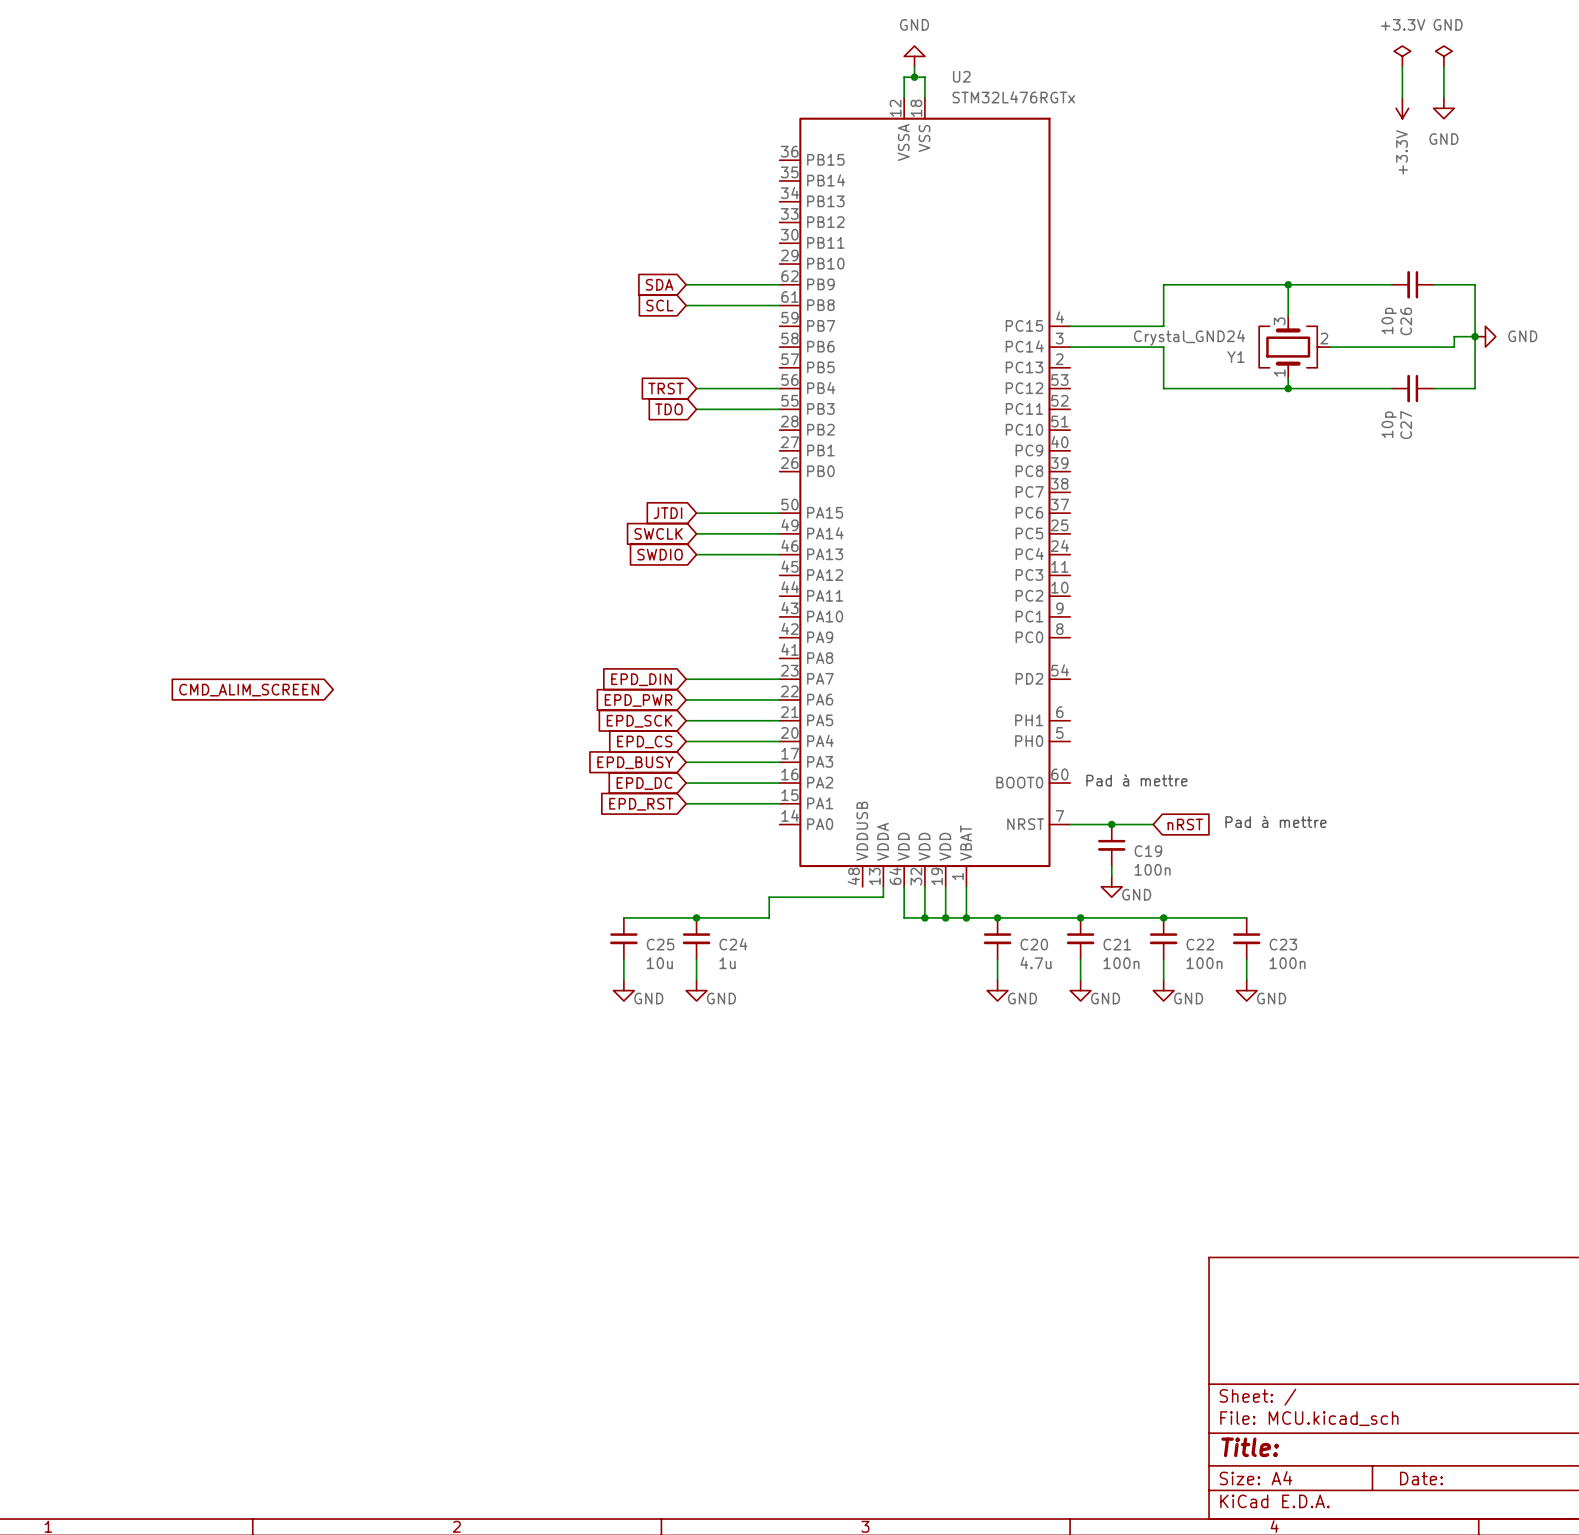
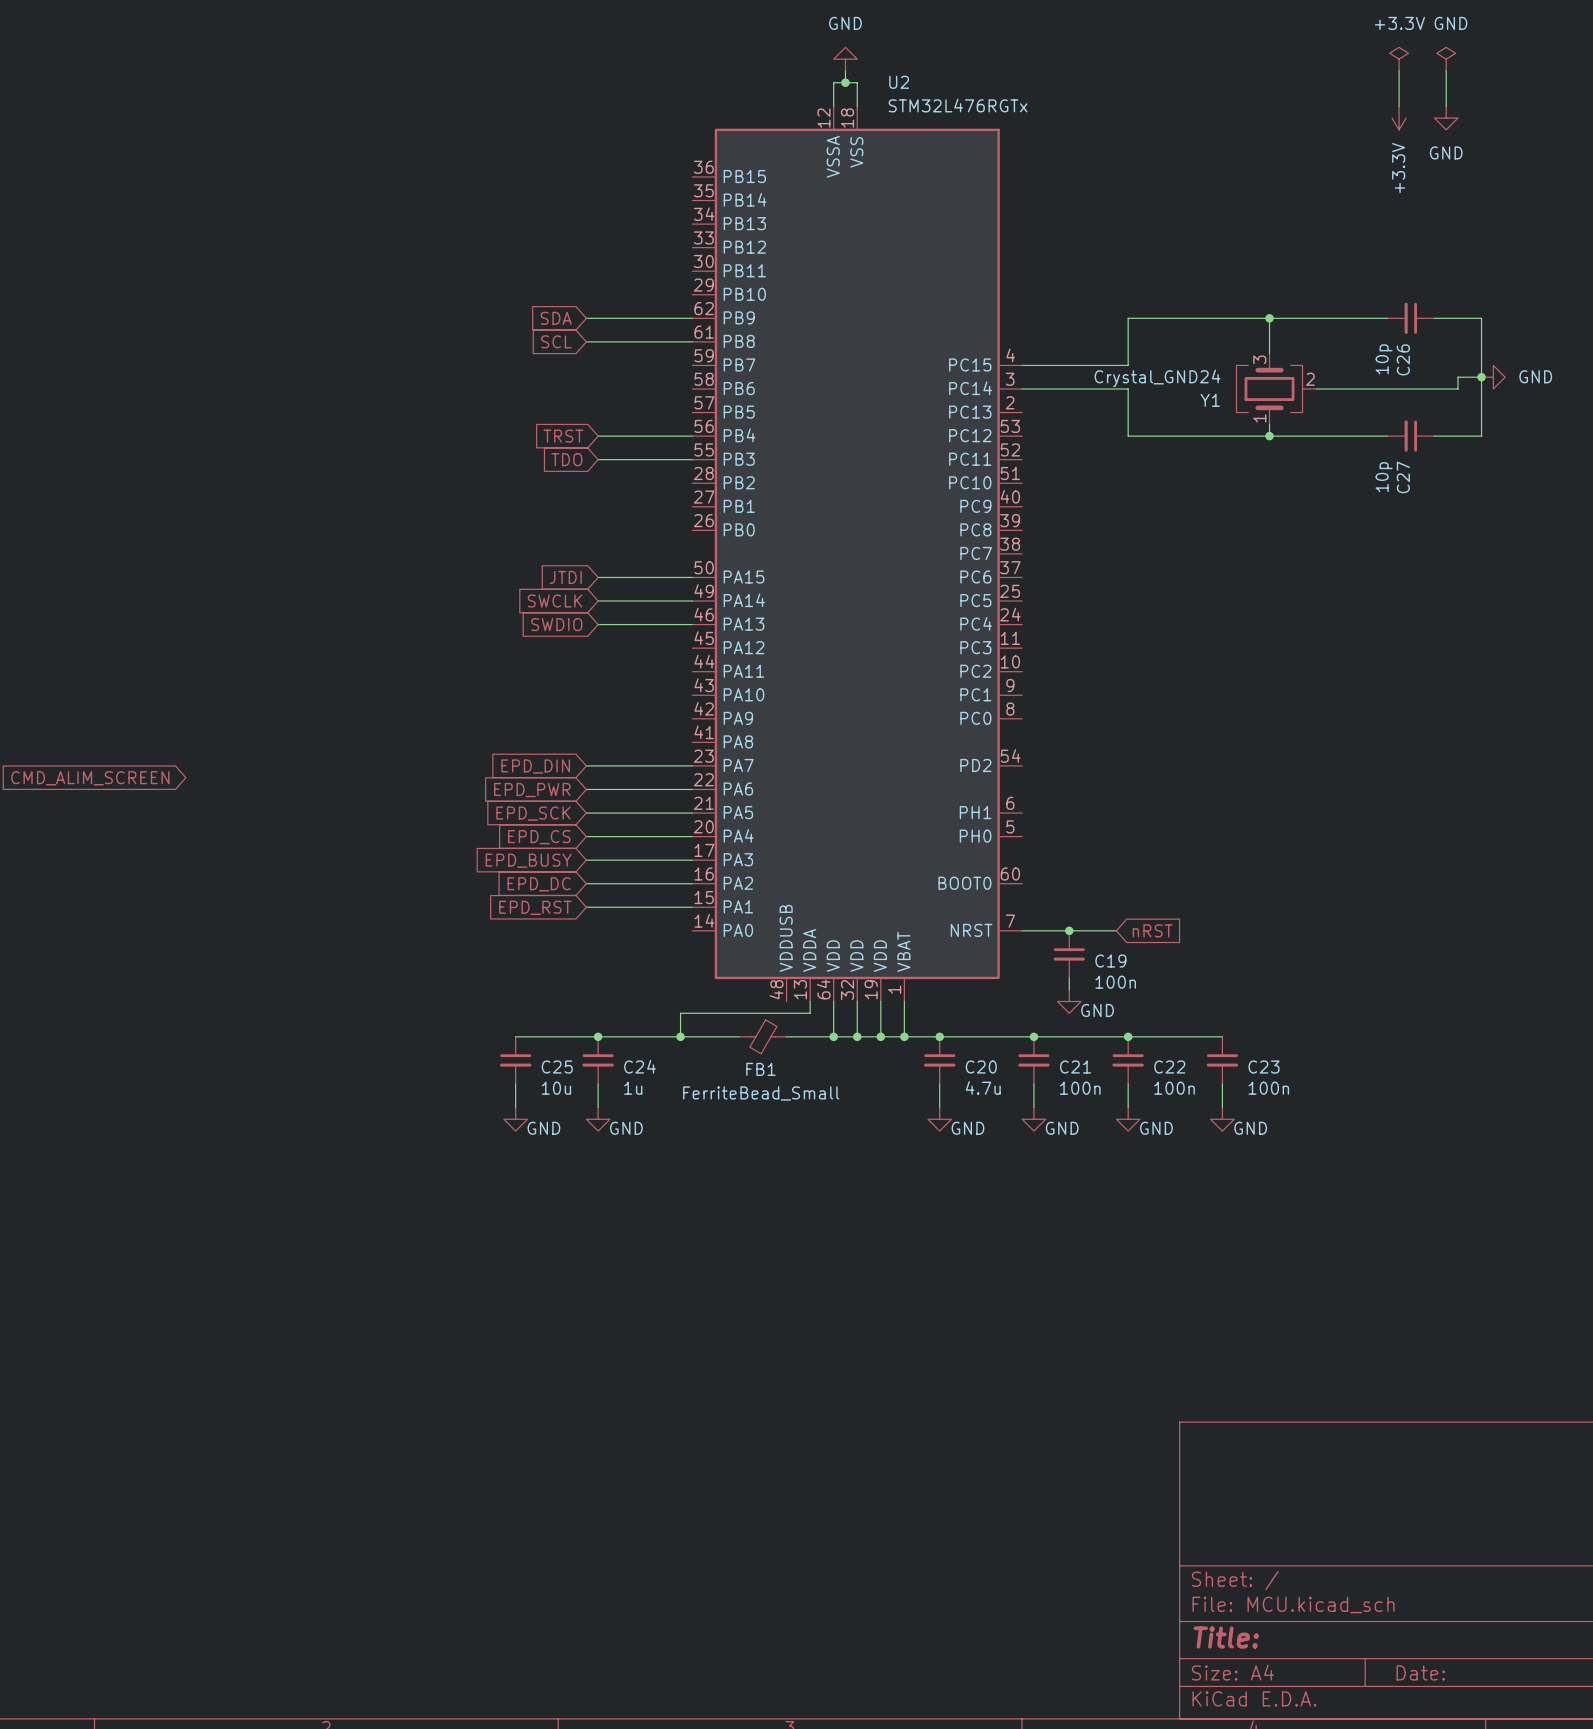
text: Pad à mettre (1136, 780) -> none
text: Pad à mettre (1276, 821) -> none
wire: none -> (680, 1036) (739, 1036)
junction: none -> (680, 1036)
FB1: none -> FerriteBead_Small (763, 1036)
wire: none -> (786, 1036) (833, 1036)
junction: none -> (833, 1036)

